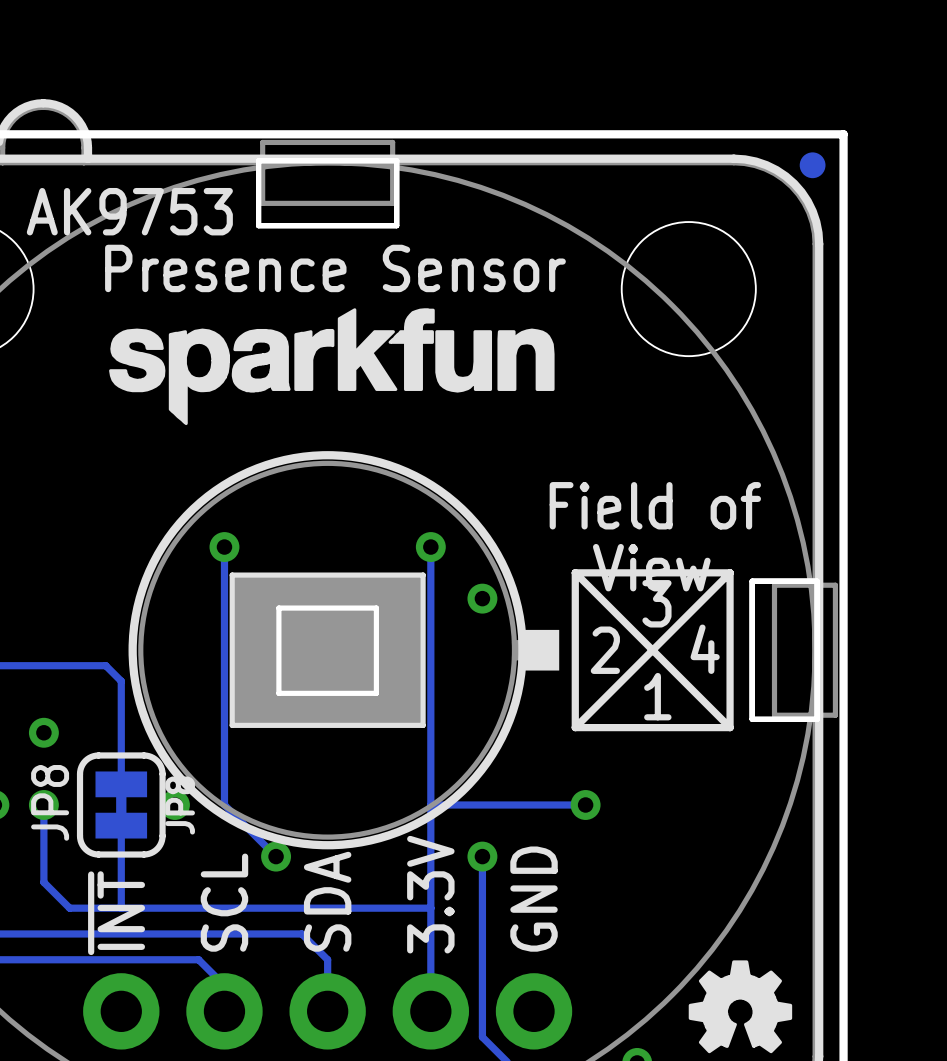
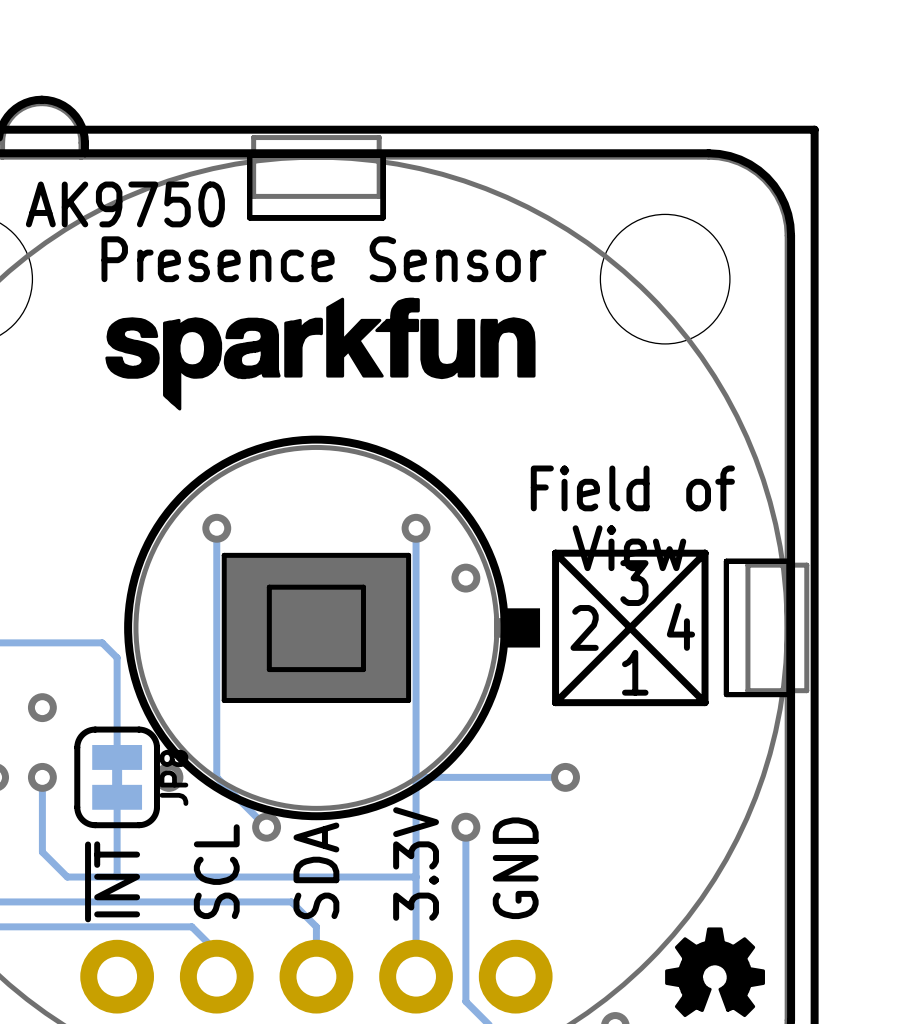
part: (812, 165) -> none
text: AK9753 (129, 211) -> AK9750 (125, 204)
text: JP8 (50, 802) -> none

